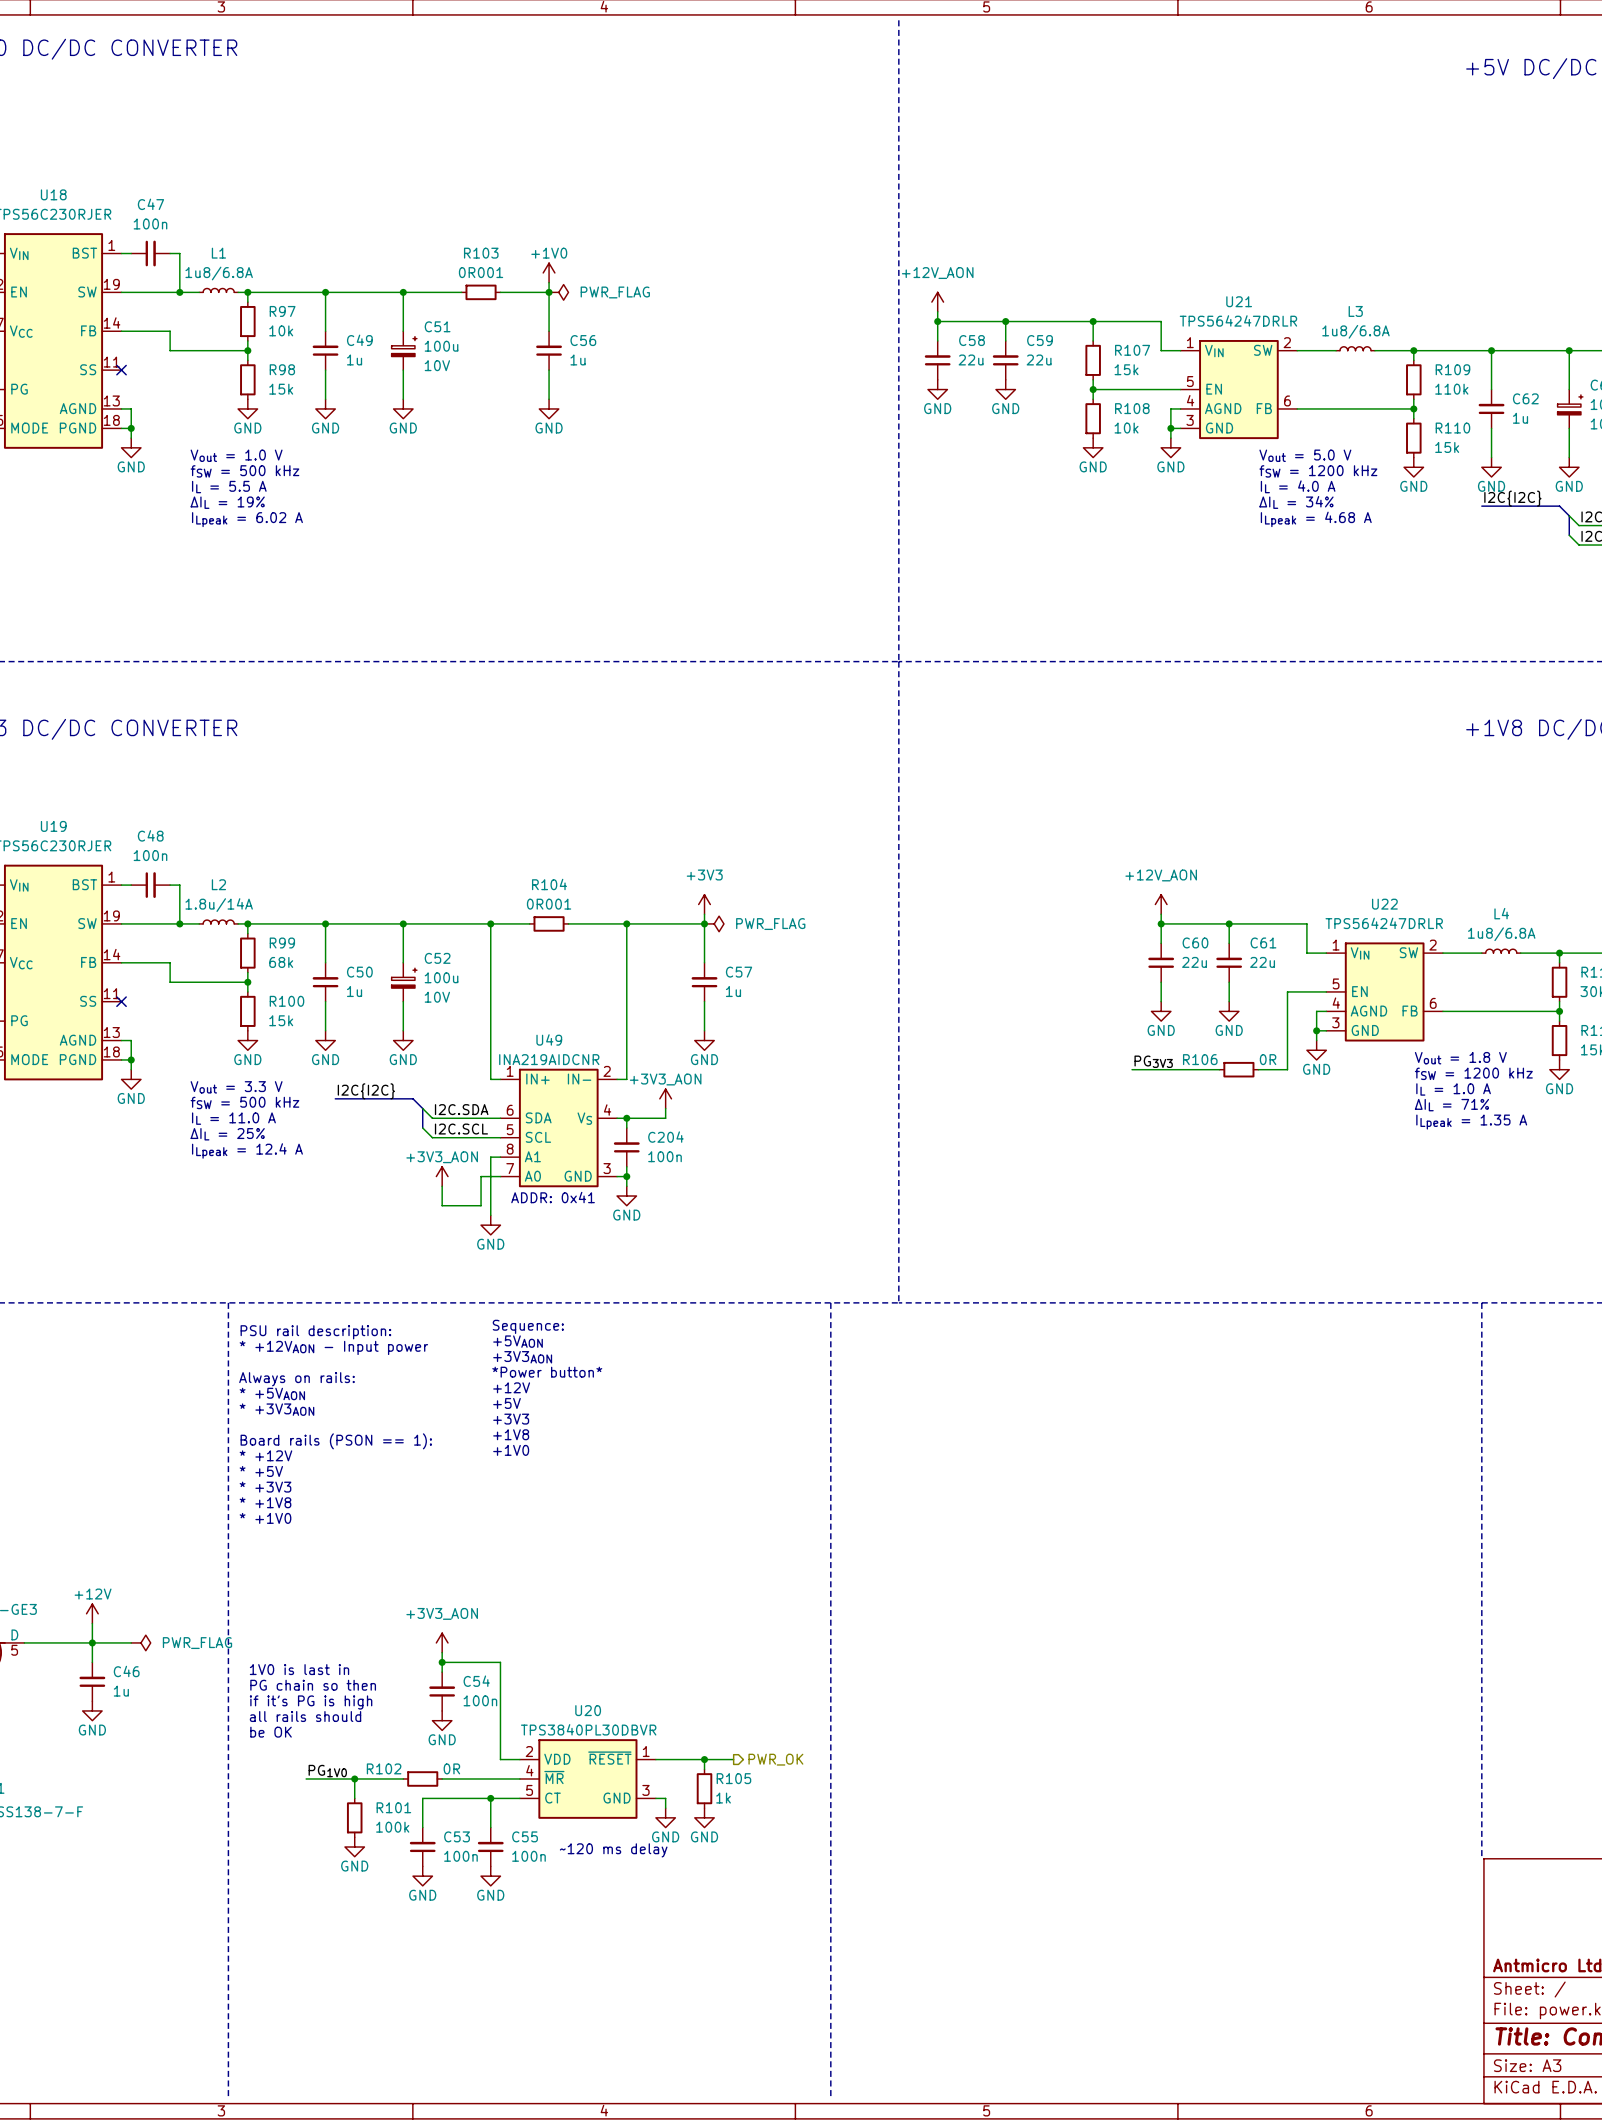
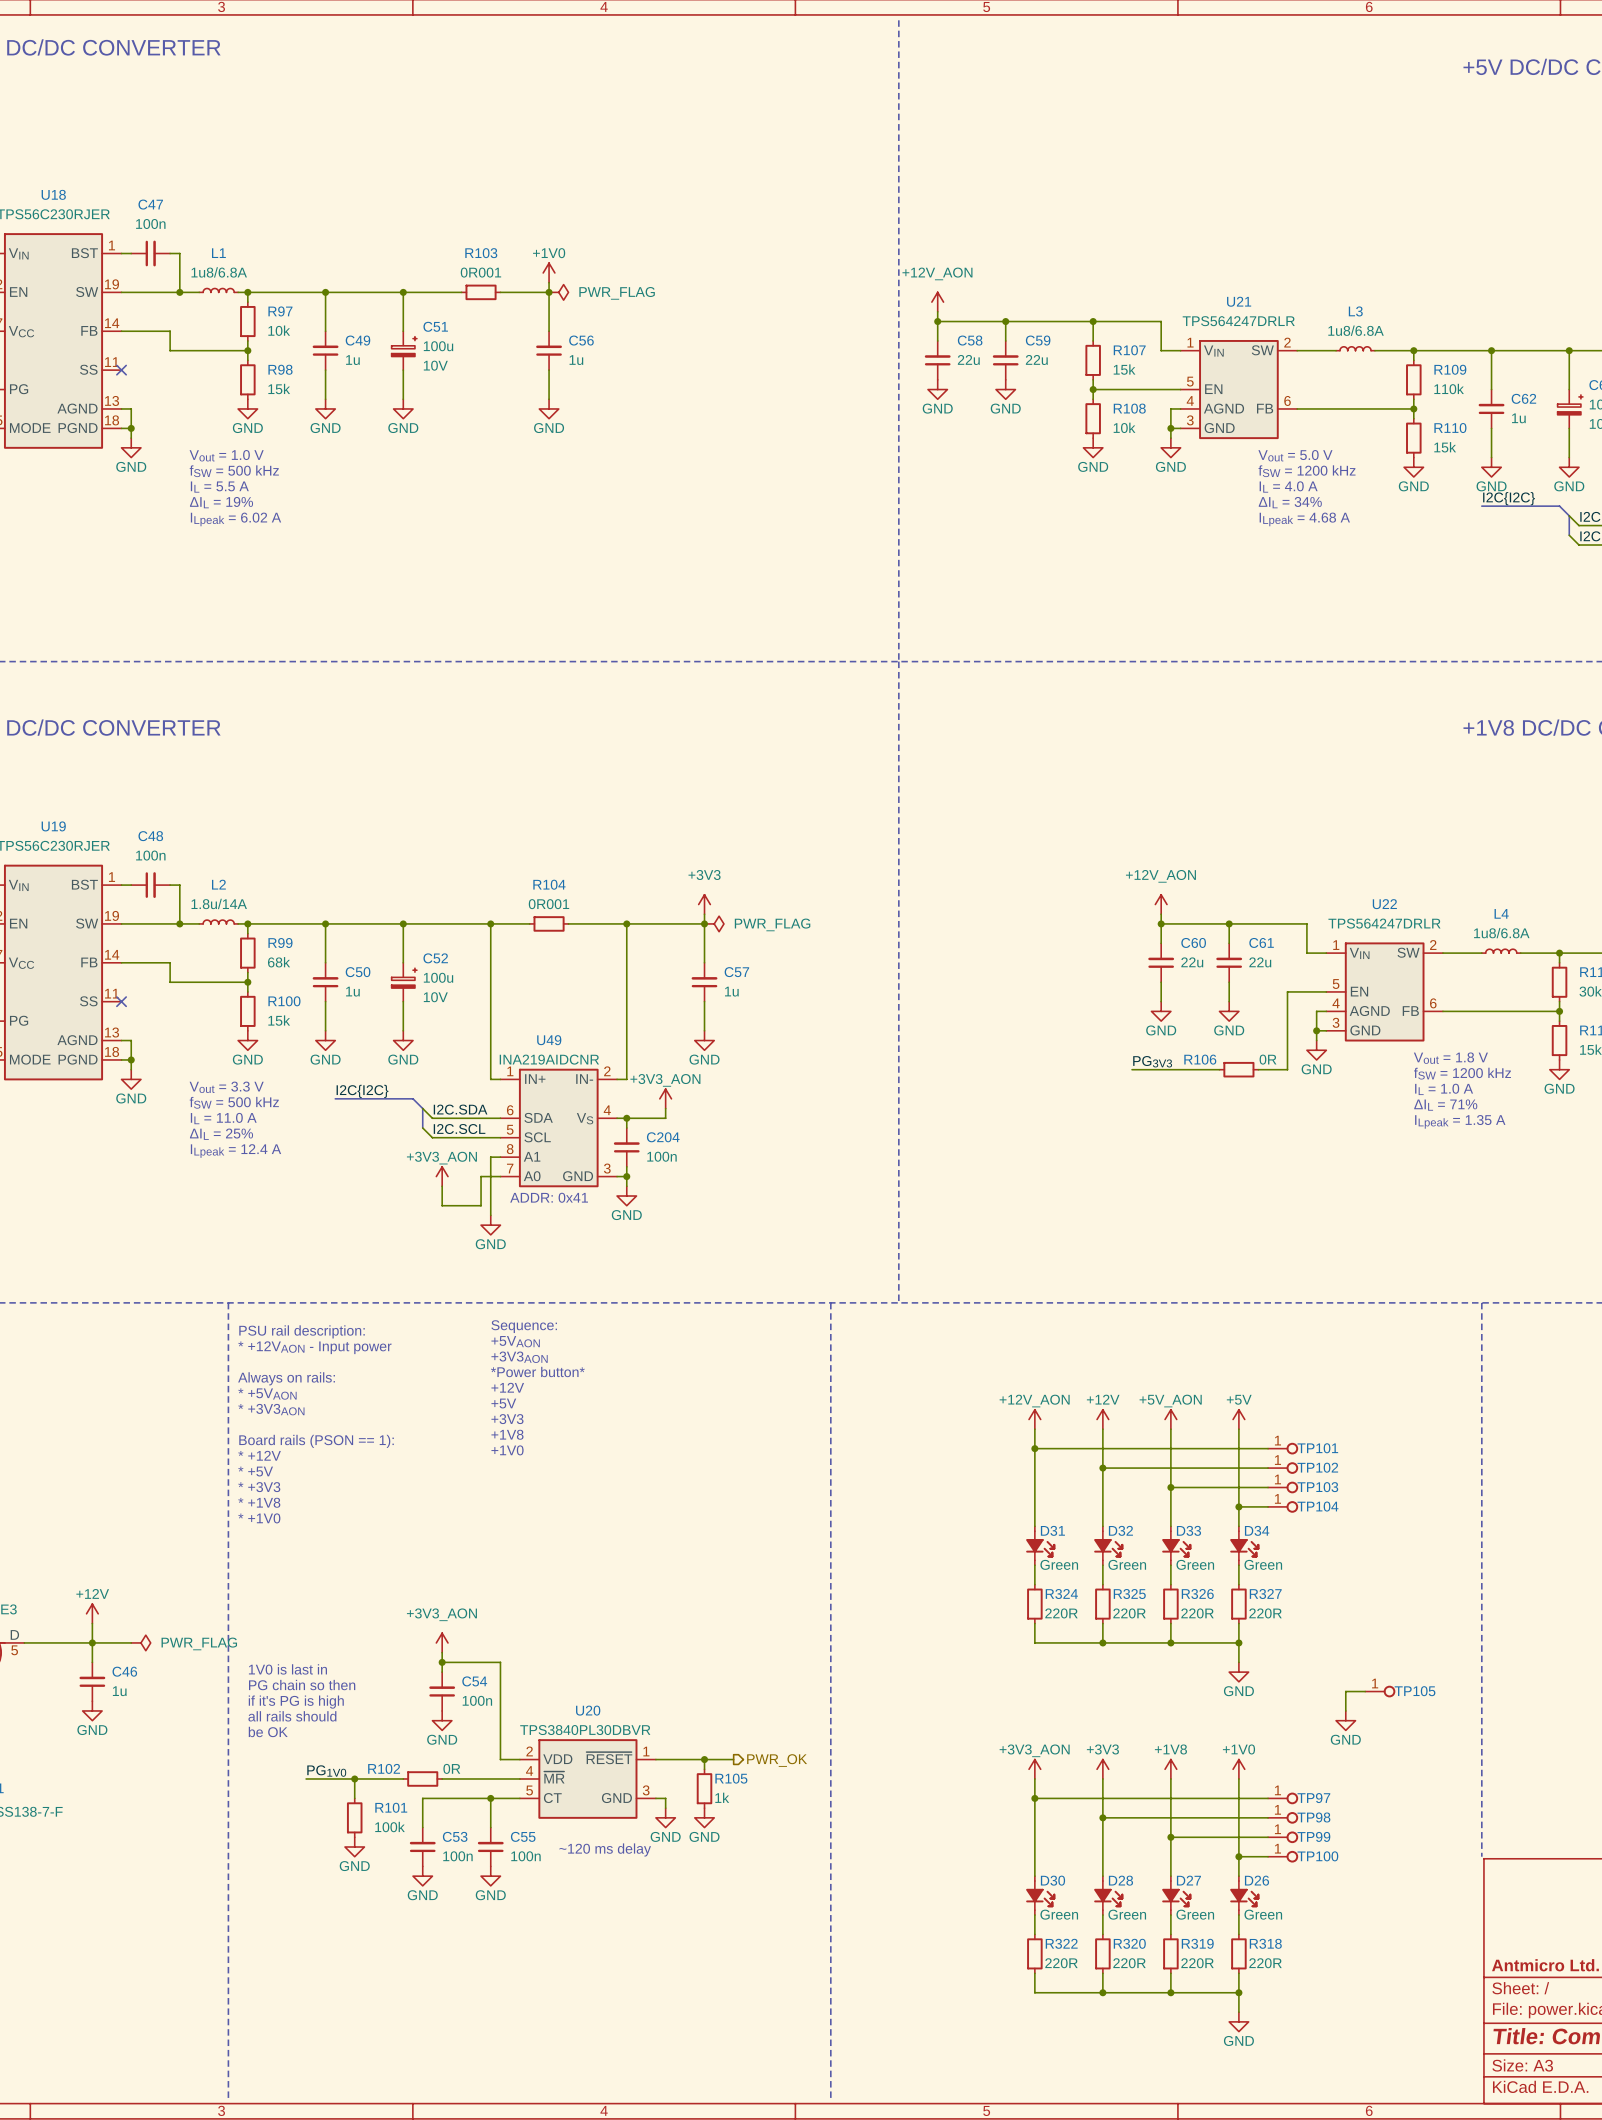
power symbol: none -> +12V_AON (1034, 1419)
power symbol: none -> +12V (1102, 1419)
power symbol: none -> +5V_AON (1170, 1419)
power symbol: none -> +5V (1238, 1419)
wire: none -> (1034, 1429) (1034, 1526)
wire: none -> (1102, 1429) (1102, 1526)
wire: none -> (1170, 1429) (1170, 1526)
wire: none -> (1238, 1429) (1238, 1526)
wire: none -> (1034, 1448) (1268, 1448)
junction: none -> (1034, 1448)
TP101: none -> (1283, 1448)
wire: none -> (1102, 1468) (1268, 1468)
junction: none -> (1102, 1468)
TP102: none -> (1283, 1468)
wire: none -> (1170, 1487) (1268, 1487)
junction: none -> (1170, 1487)
TP103: none -> (1283, 1487)
wire: none -> (1238, 1506) (1268, 1506)
junction: none -> (1238, 1506)
TP104: none -> (1283, 1506)
D31: none -> (1040, 1545)
D32: none -> (1108, 1545)
D33: none -> (1176, 1545)
D34: none -> (1244, 1545)
wire: none -> (1034, 1565) (1034, 1584)
wire: none -> (1102, 1565) (1102, 1584)
wire: none -> (1170, 1565) (1170, 1584)
wire: none -> (1238, 1565) (1238, 1584)
R324: none -> (1034, 1604)
R325: none -> (1102, 1604)
R326: none -> (1170, 1604)
R327: none -> (1238, 1604)
wire: none -> (1034, 1623) (1034, 1642) (1238, 1642)
wire: none -> (1102, 1623) (1102, 1642)
wire: none -> (1170, 1623) (1170, 1642)
wire: none -> (1238, 1623) (1238, 1662)
junction: none -> (1102, 1642)
junction: none -> (1170, 1642)
junction: none -> (1238, 1642)
power symbol: none -> GND (1238, 1672)
wire: none -> (1365, 1691) (1345, 1691) (1345, 1710)
TP105: none -> (1380, 1691)
power symbol: none -> GND (1345, 1720)
power symbol: none -> +3V3_AON (1034, 1769)
power symbol: none -> +3V3 (1102, 1769)
power symbol: none -> +1V8 (1170, 1769)
power symbol: none -> +1V0 (1238, 1769)
wire: none -> (1034, 1778) (1034, 1876)
wire: none -> (1102, 1778) (1102, 1876)
wire: none -> (1170, 1778) (1170, 1876)
wire: none -> (1238, 1778) (1238, 1876)
wire: none -> (1034, 1798) (1268, 1798)
junction: none -> (1034, 1798)
TP97: none -> (1283, 1798)
wire: none -> (1102, 1817) (1268, 1817)
junction: none -> (1102, 1817)
TP98: none -> (1283, 1817)
wire: none -> (1170, 1837) (1268, 1837)
junction: none -> (1170, 1837)
TP99: none -> (1283, 1837)
wire: none -> (1238, 1856) (1268, 1856)
junction: none -> (1238, 1856)
TP100: none -> (1283, 1856)
D30: none -> (1040, 1895)
D28: none -> (1108, 1895)
D27: none -> (1176, 1895)
D26: none -> (1244, 1895)
wire: none -> (1034, 1915) (1034, 1934)
wire: none -> (1102, 1915) (1102, 1934)
wire: none -> (1170, 1915) (1170, 1934)
wire: none -> (1238, 1915) (1238, 1934)
R322: none -> (1034, 1953)
R320: none -> (1102, 1953)
R319: none -> (1170, 1953)
R318: none -> (1238, 1953)
wire: none -> (1034, 1973) (1034, 1992) (1238, 1992)
wire: none -> (1102, 1973) (1102, 1992)
wire: none -> (1170, 1973) (1170, 1992)
wire: none -> (1238, 1973) (1238, 2012)
junction: none -> (1102, 1992)
junction: none -> (1170, 1992)
junction: none -> (1238, 1992)
power symbol: none -> GND (1238, 2021)

